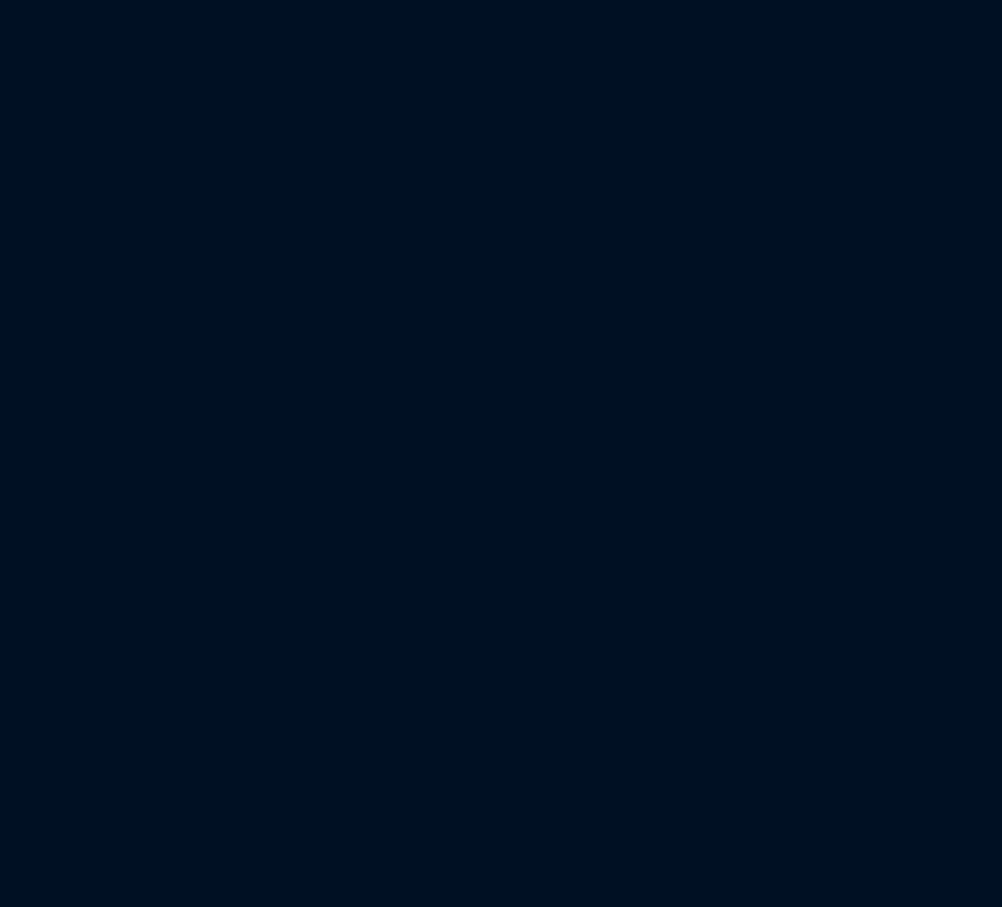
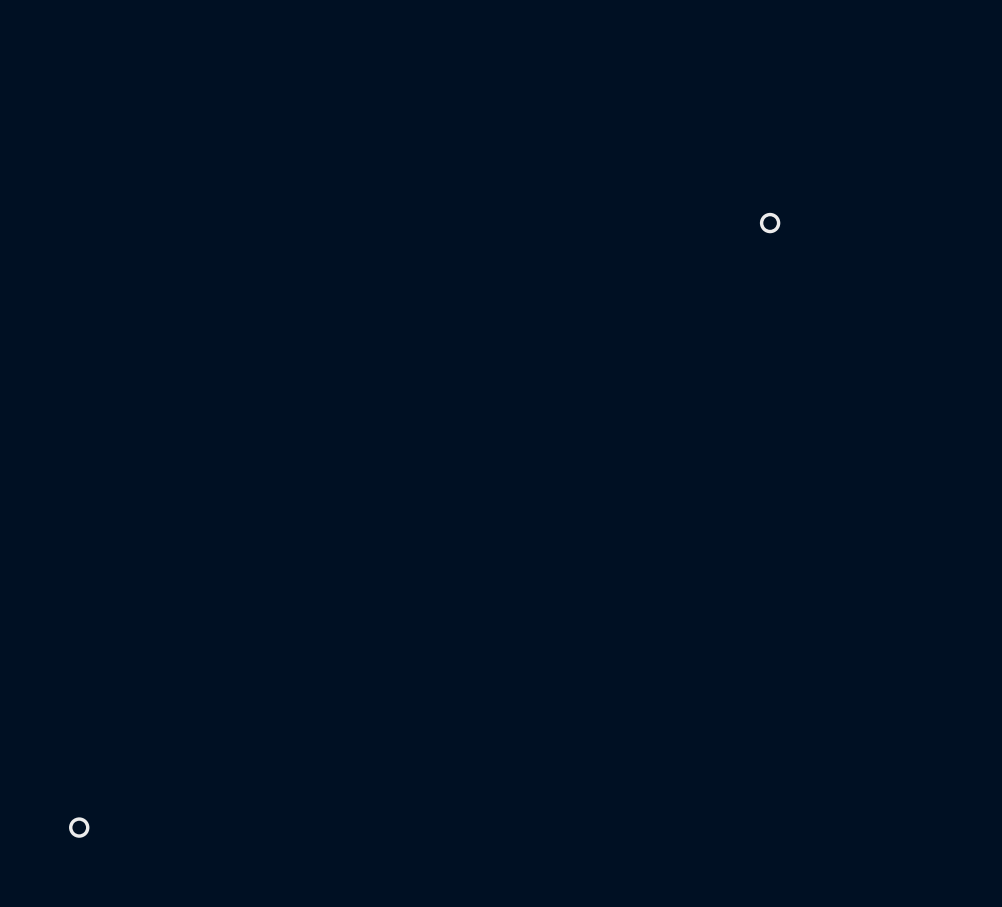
via: none -> (770, 223)
via: none -> (79, 827)

